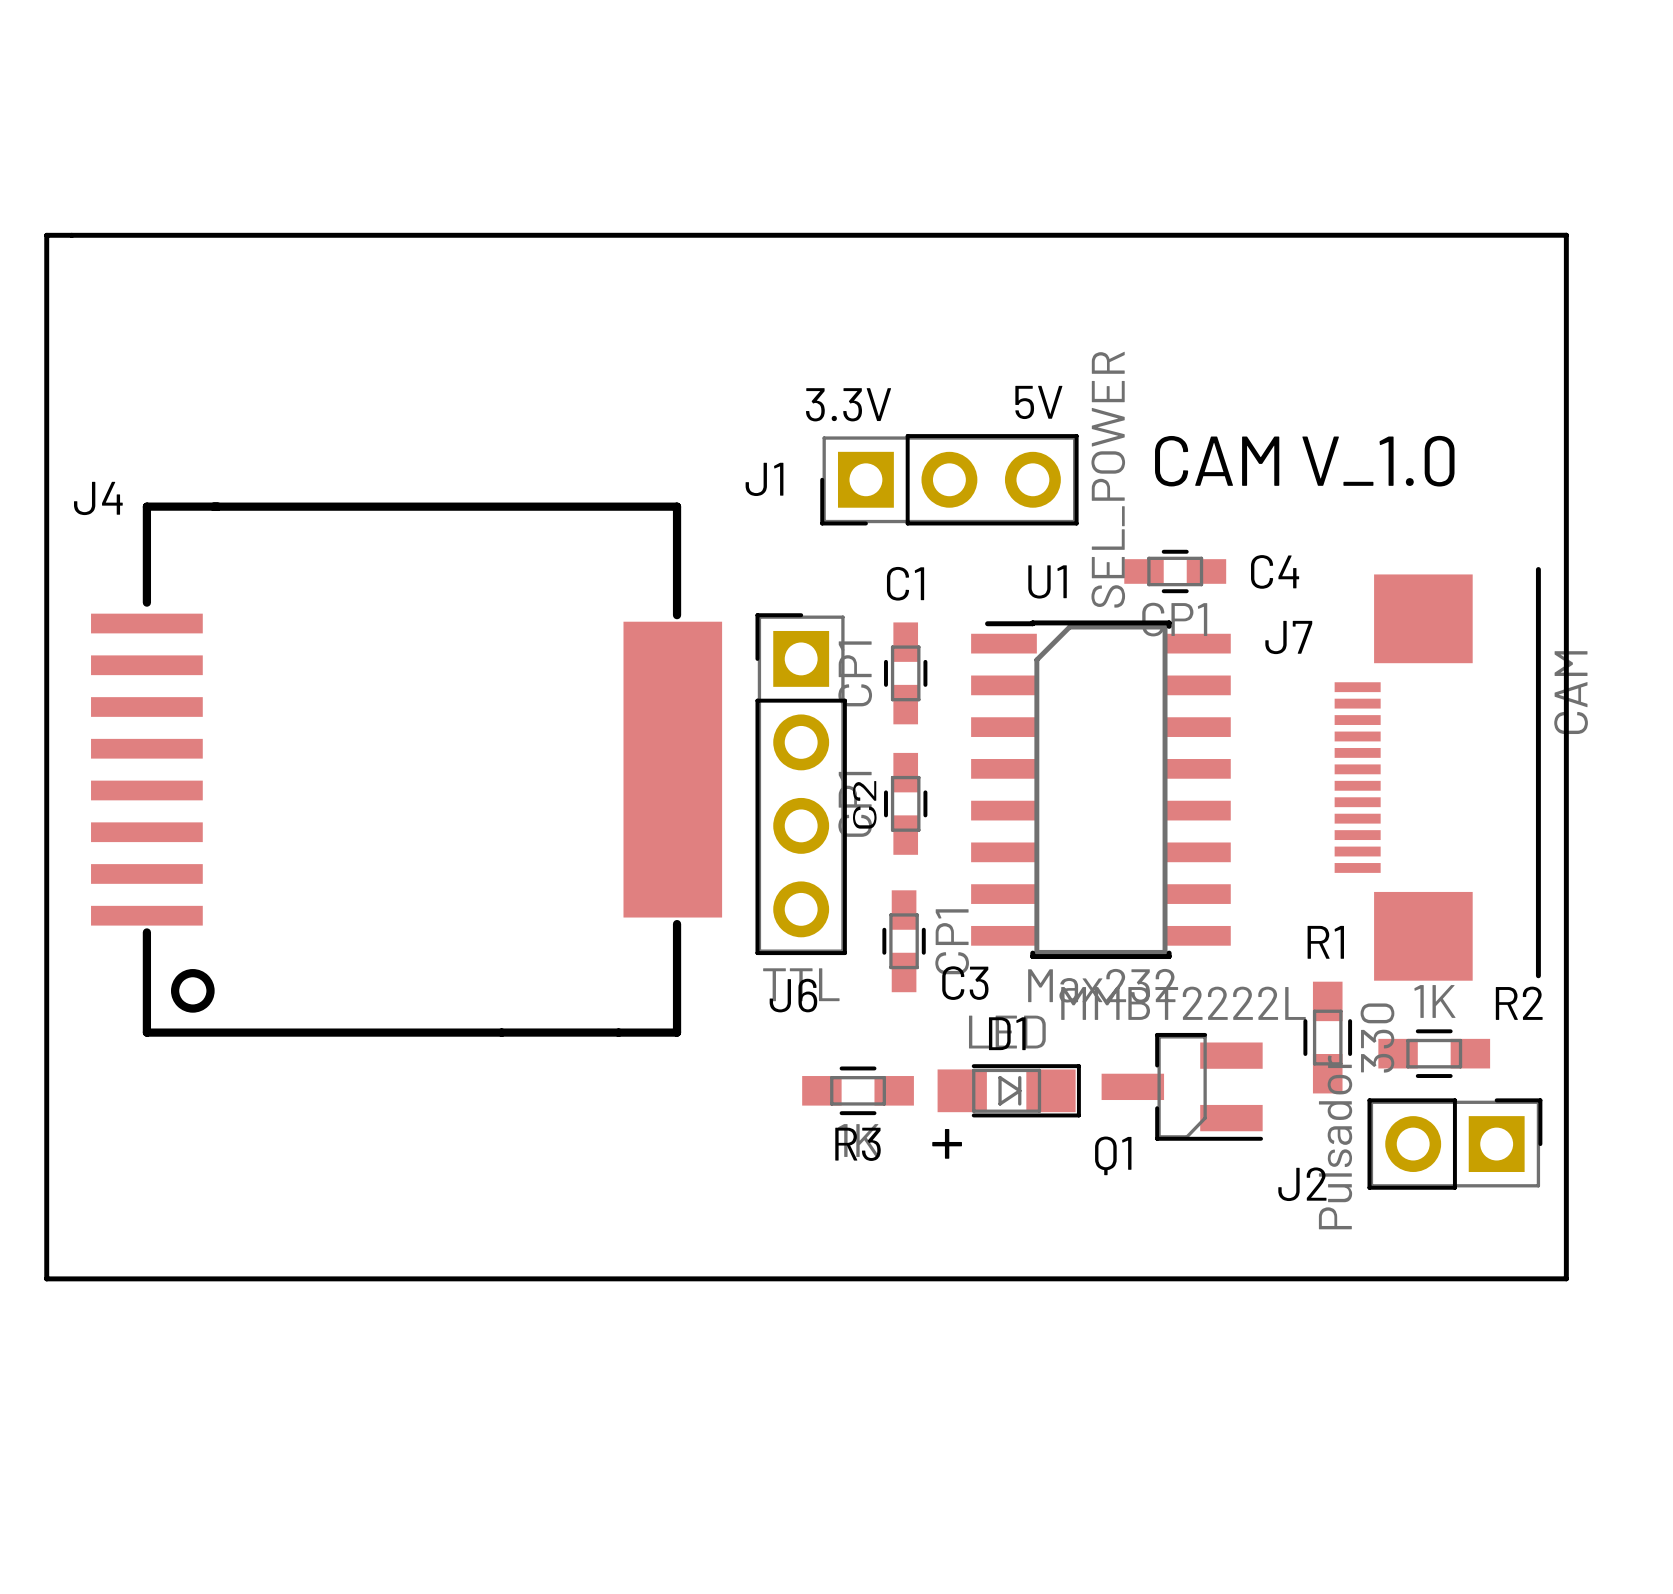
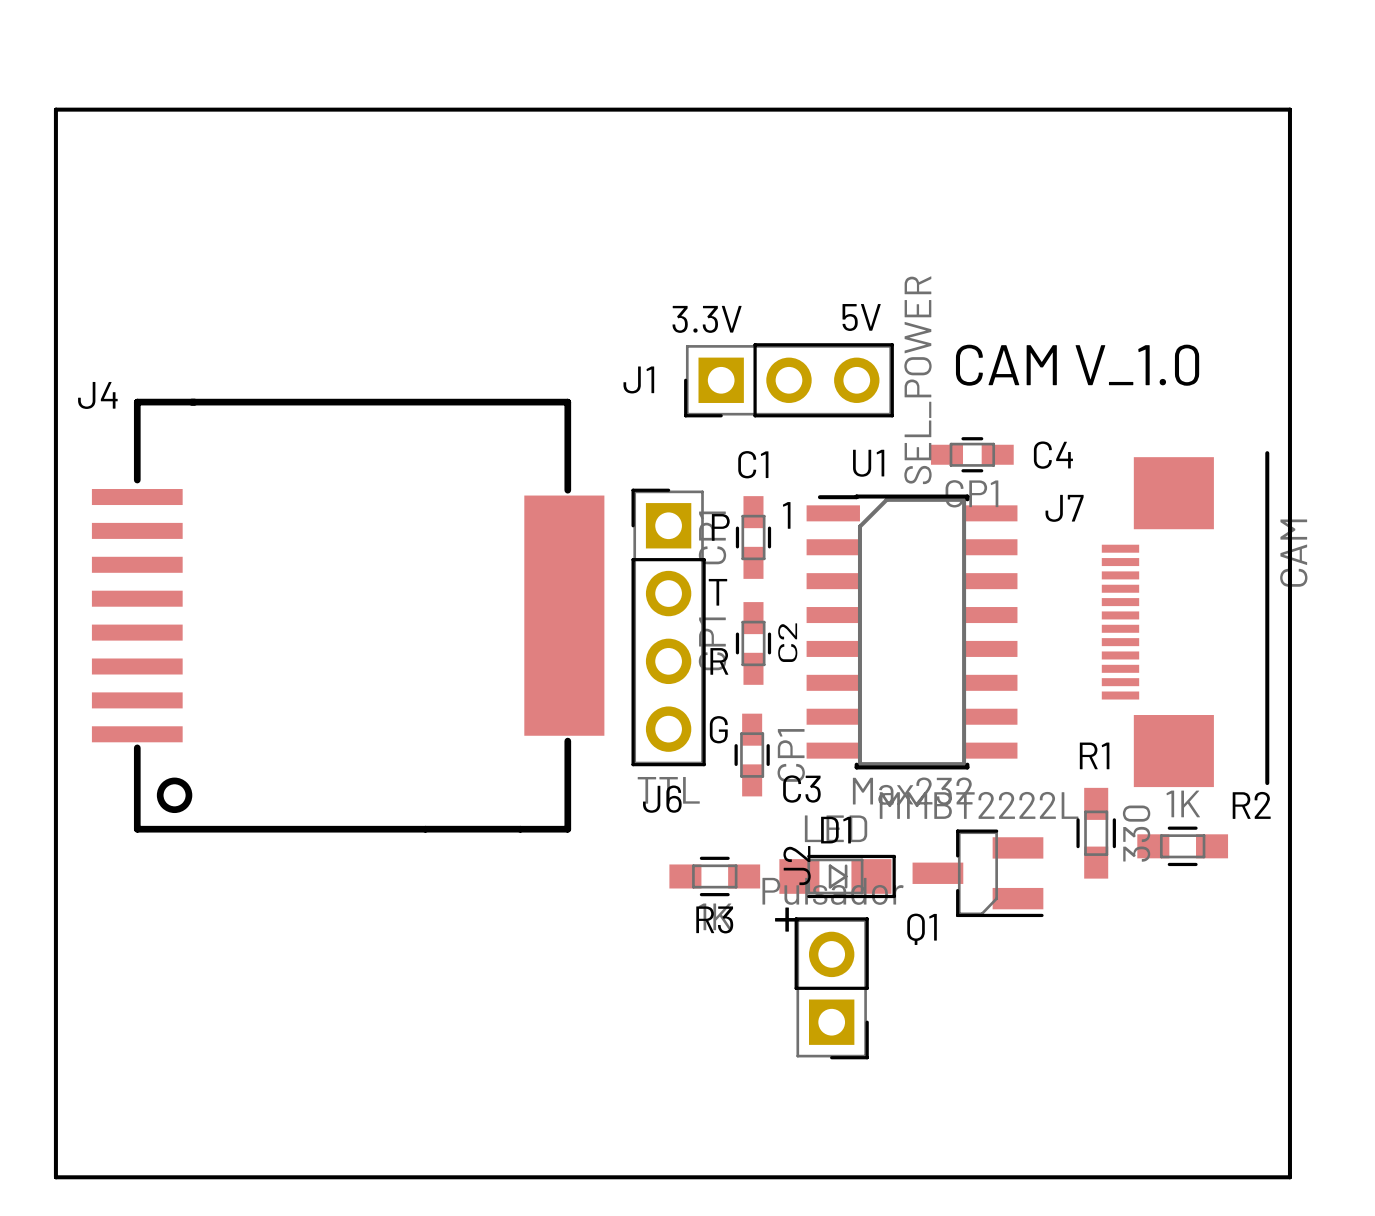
board edge: (46, 235) (1566, 235) -> (55, 181) (55, 109) (1289, 109) (1289, 181)
text: none -> 1 (786, 515)
text: none -> P (720, 527)
text: none -> T (717, 592)
C2 name position: C2 (864, 804) -> C2 (787, 642)
text: none -> R (719, 661)
text: none -> G (718, 729)
J2 rotation: 0° (1454, 1144) -> 90° clockwise (831, 988)
J2 position: (1454, 1144) -> (831, 988)
board edge: (46, 1278) (1566, 1278) -> (55, 1029) (55, 1177) (1289, 1177) (1289, 1029)

